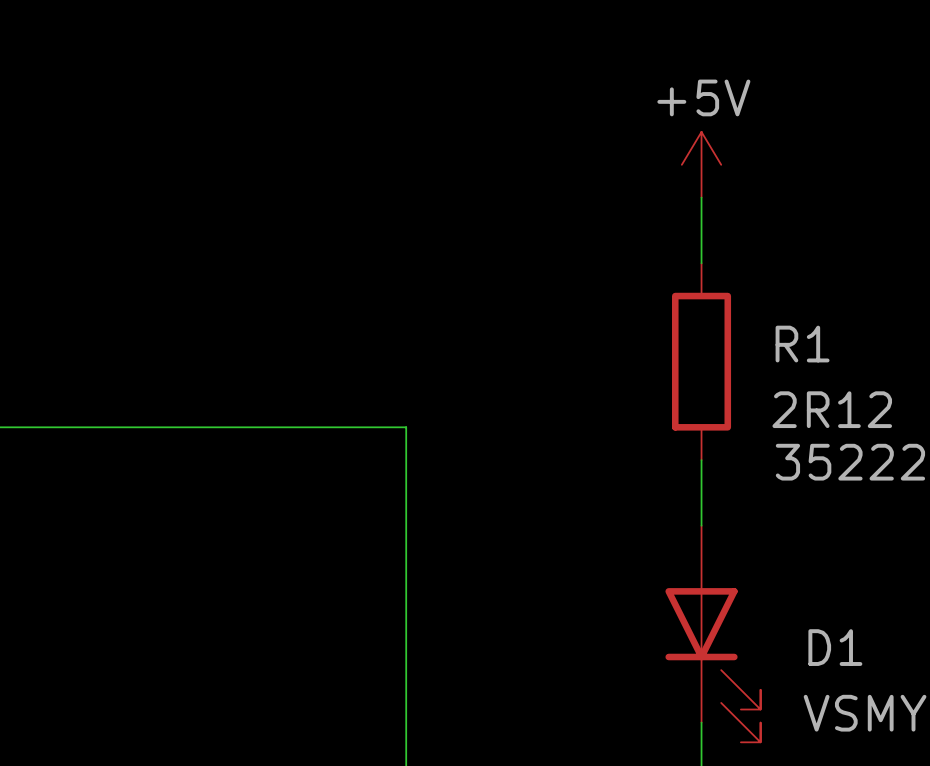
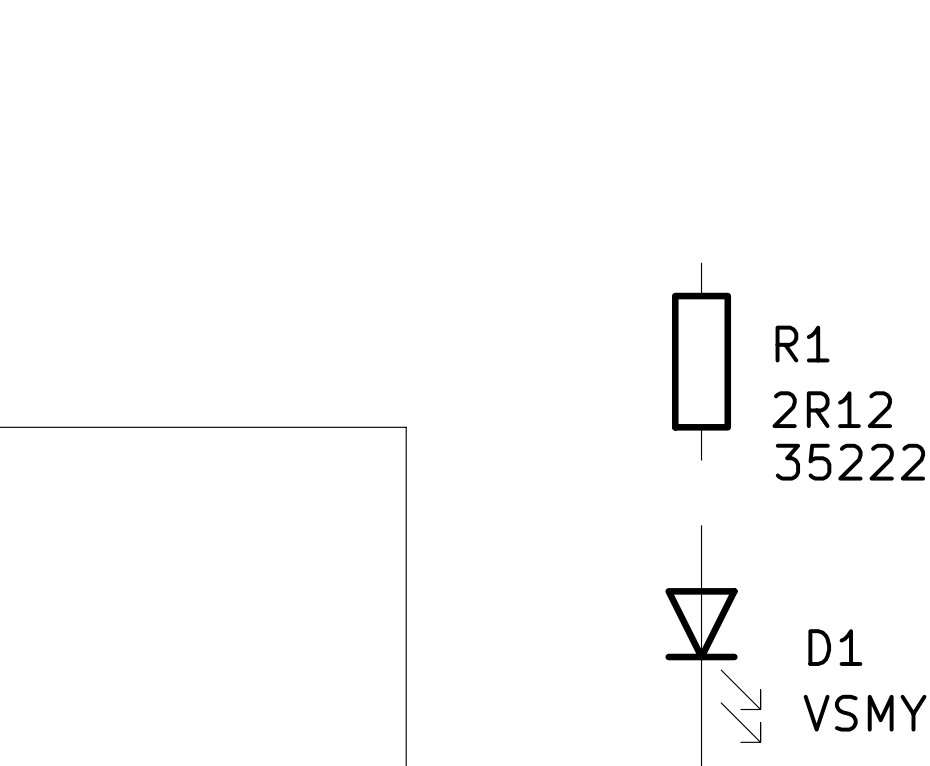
power symbol: +5V (701, 164) -> none
wire: (701, 197) (701, 263) -> none
wire: (701, 460) (701, 525) -> none

